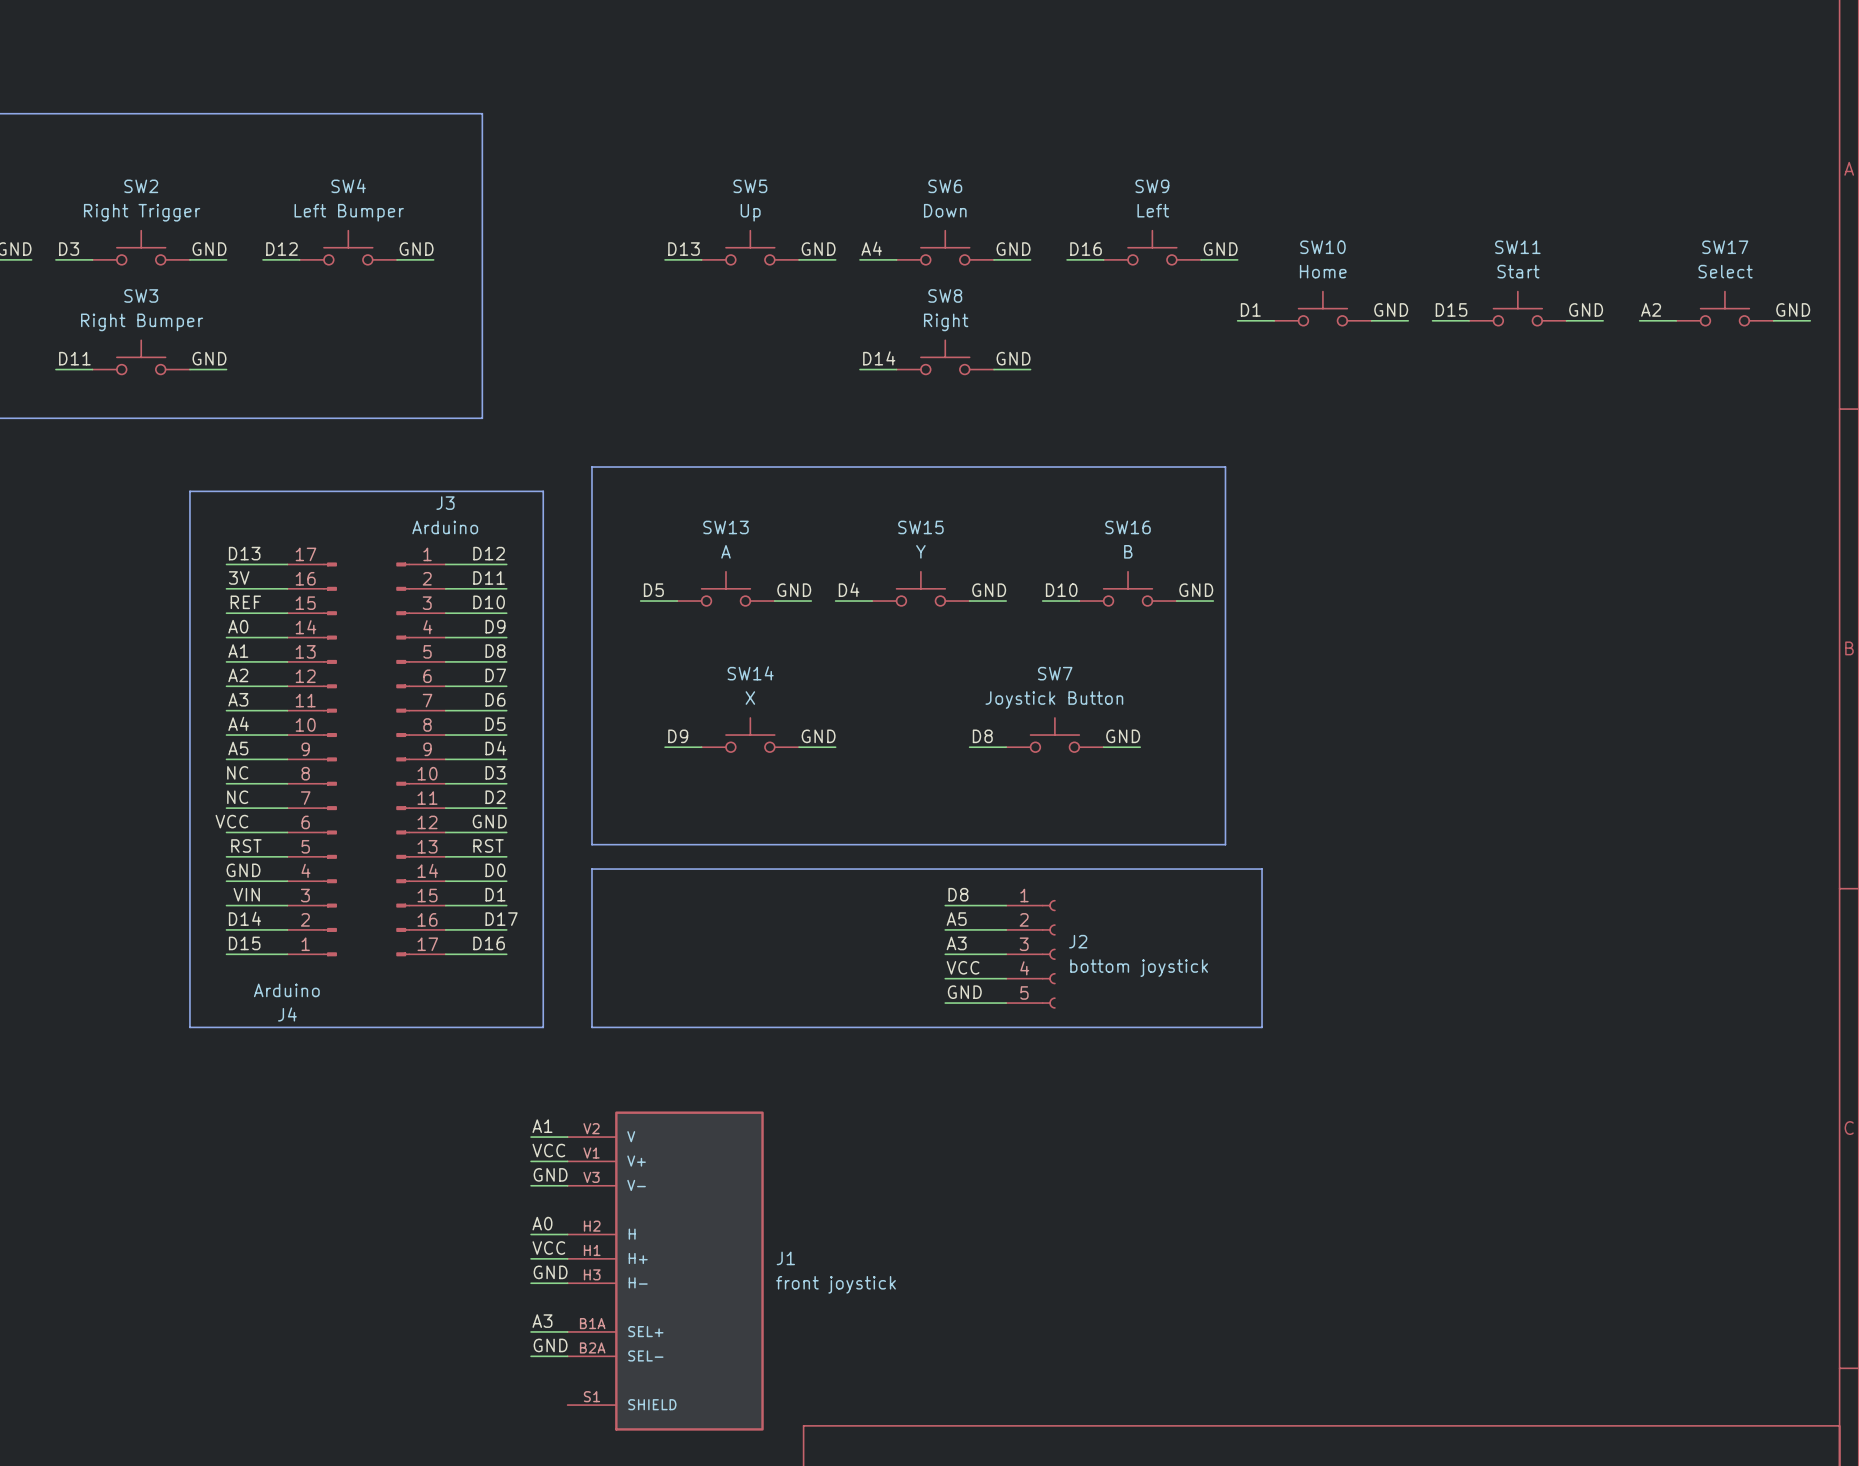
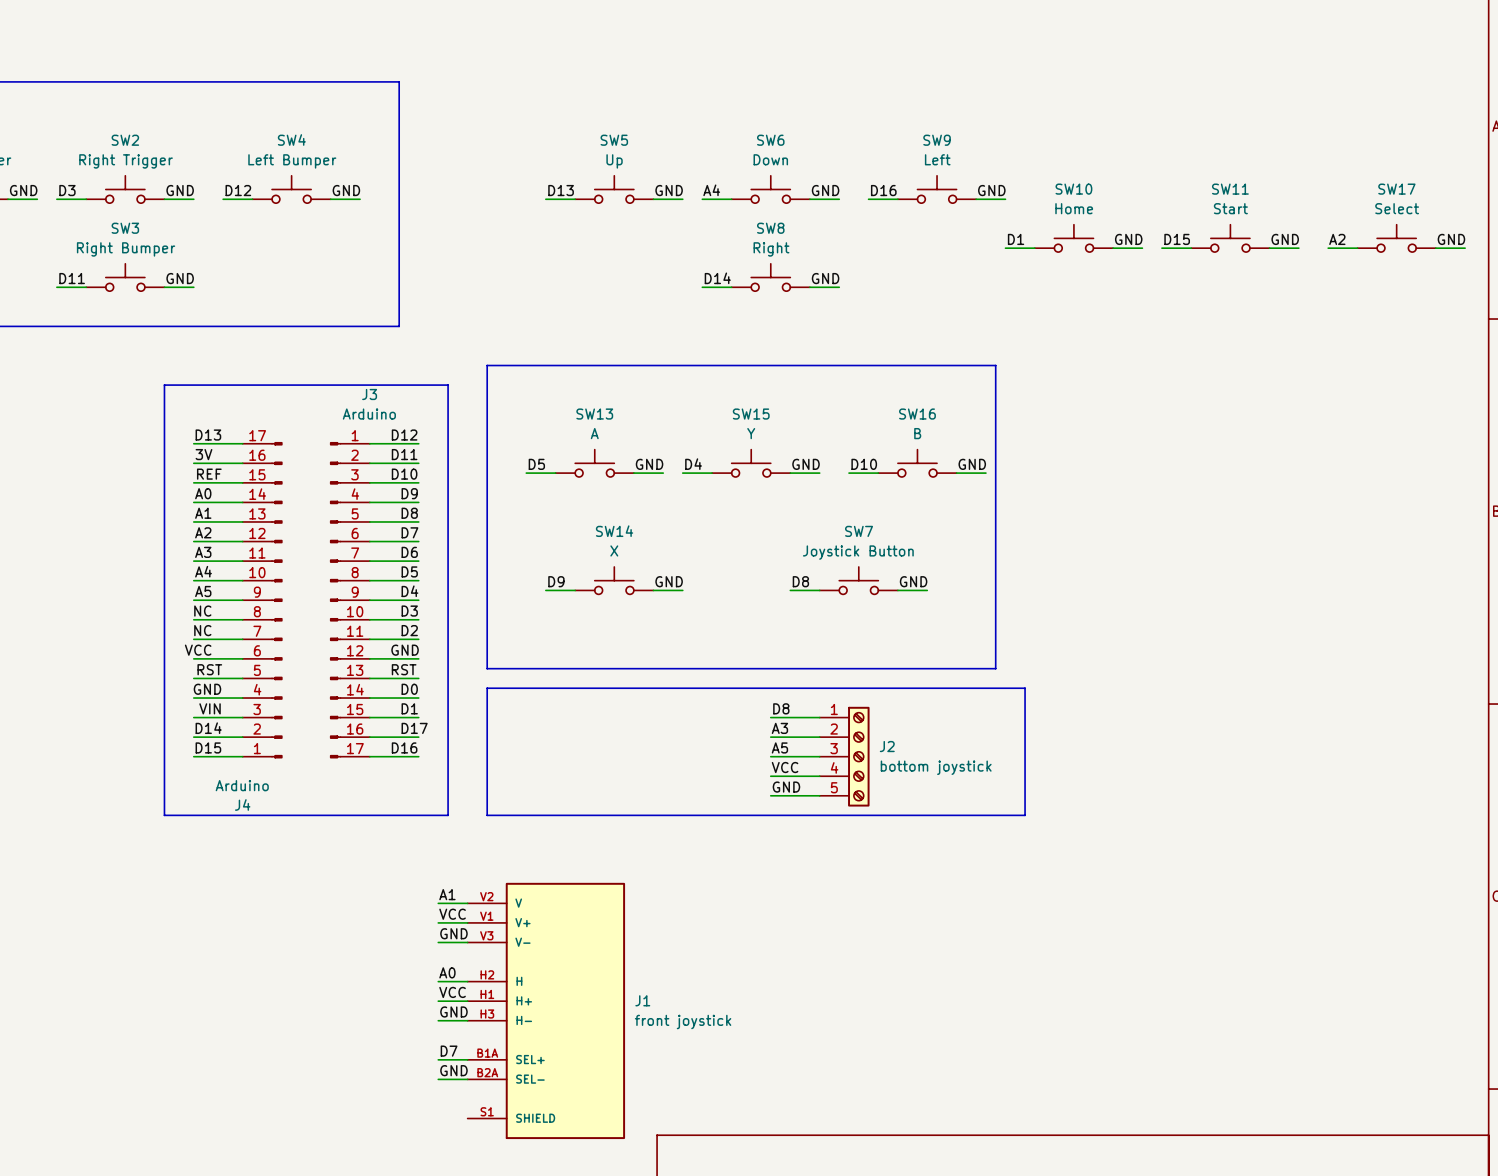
J2 symbol: [1006, 899, 1056, 1009] -> [819, 706, 870, 807]
label: A5 (956, 919) -> A3 (779, 728)
label: A3 (956, 943) -> A5 (779, 747)
label: A3 (542, 1321) -> D7 (449, 1051)

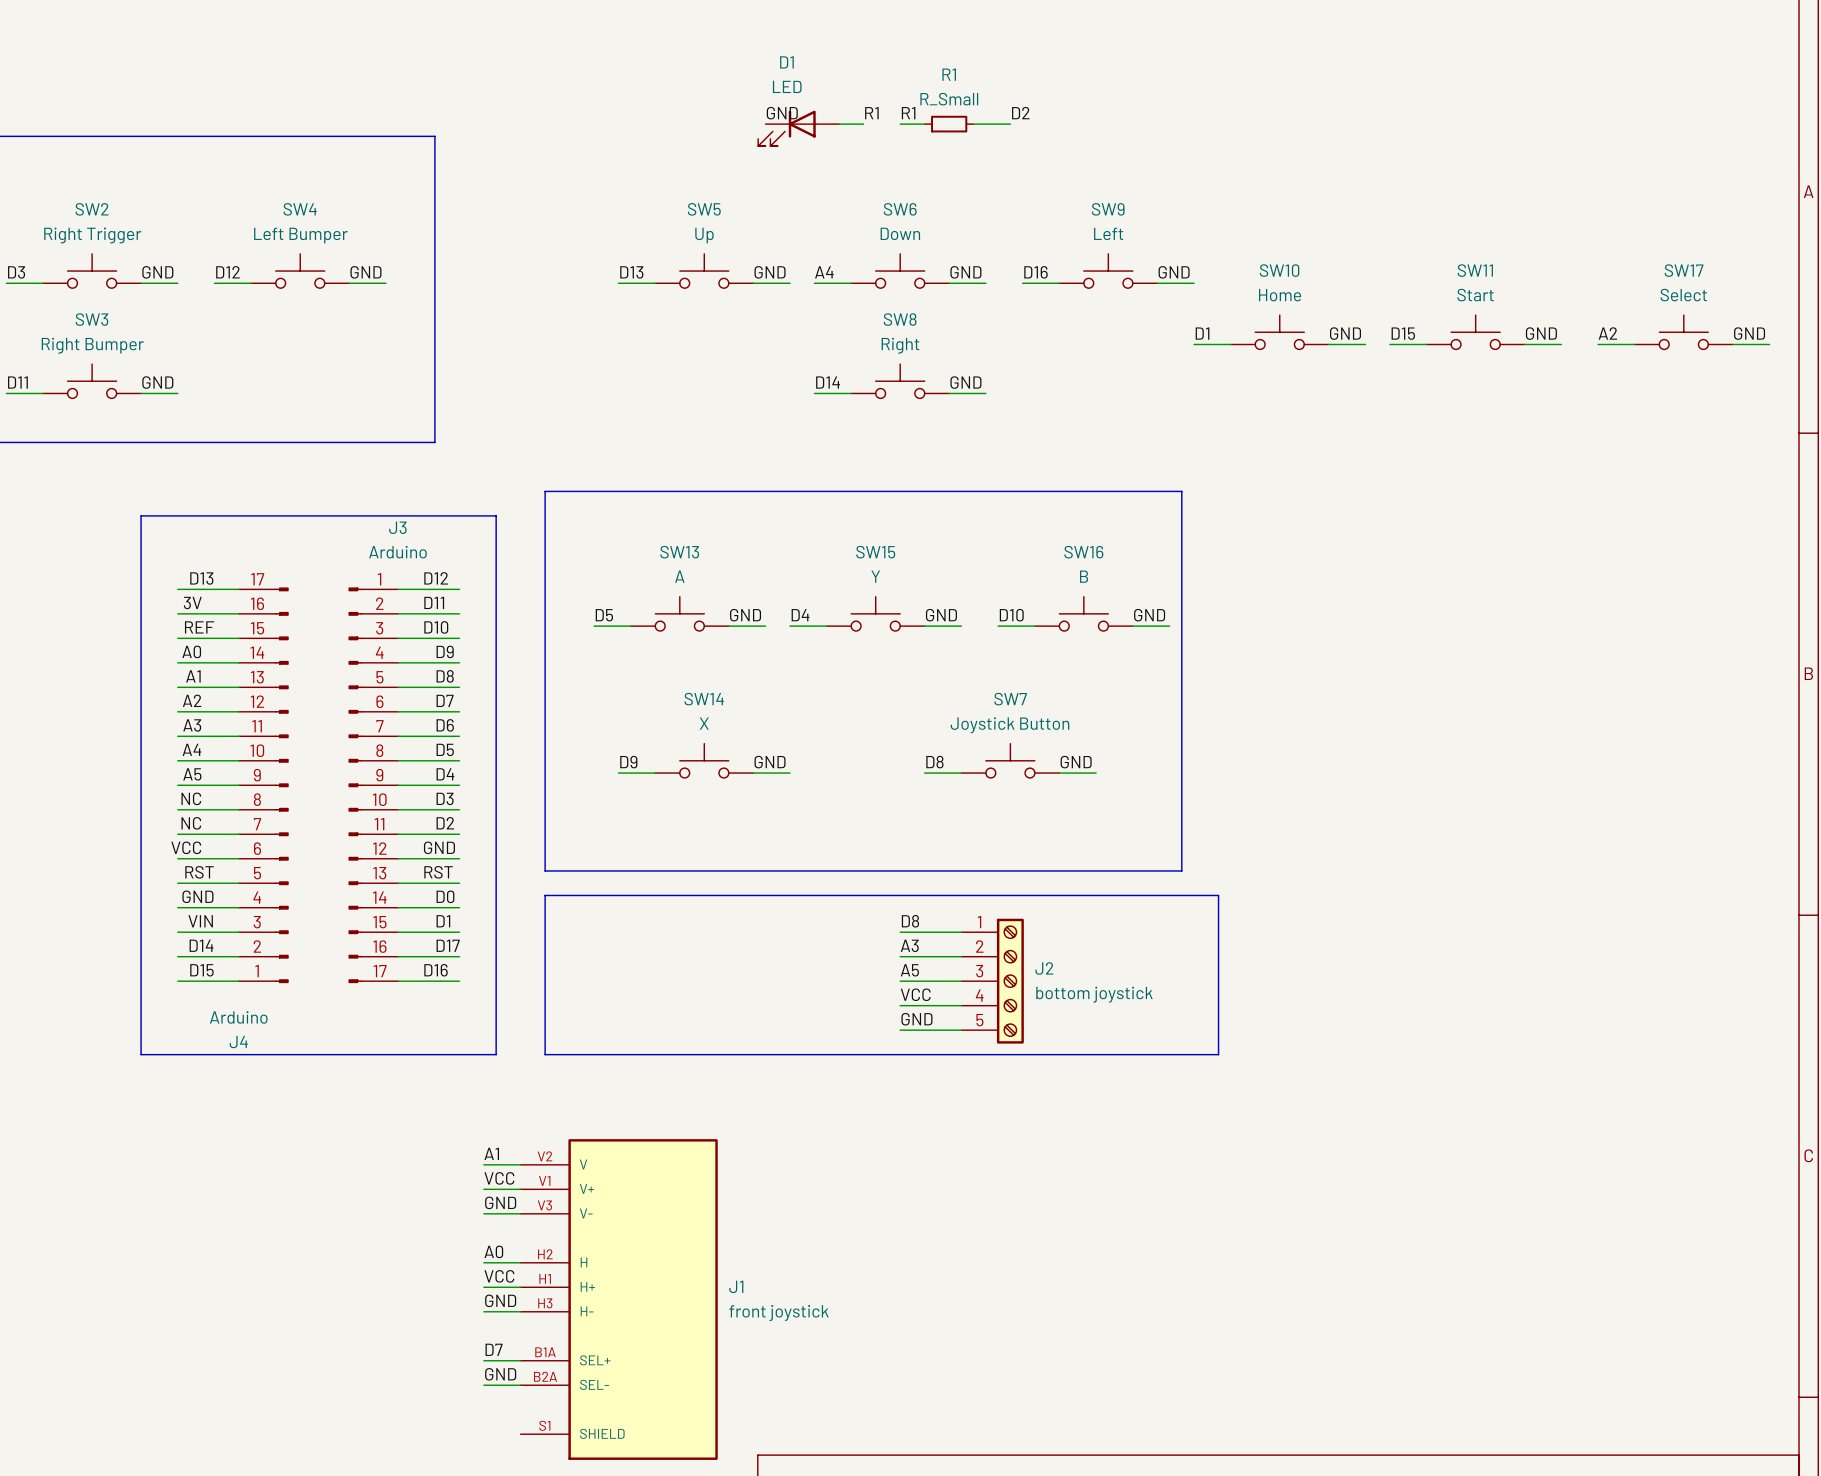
label: none -> GND (782, 113)
label: none -> R1 (871, 113)
label: none -> R1 (908, 113)
label: none -> D2 (1020, 113)
wire: none -> (838, 124) (863, 124)
wire: none -> (900, 124) (924, 124)
R1: none -> R_Small (949, 124)
wire: none -> (973, 124) (1010, 124)
D1: none -> LED (798, 128)

